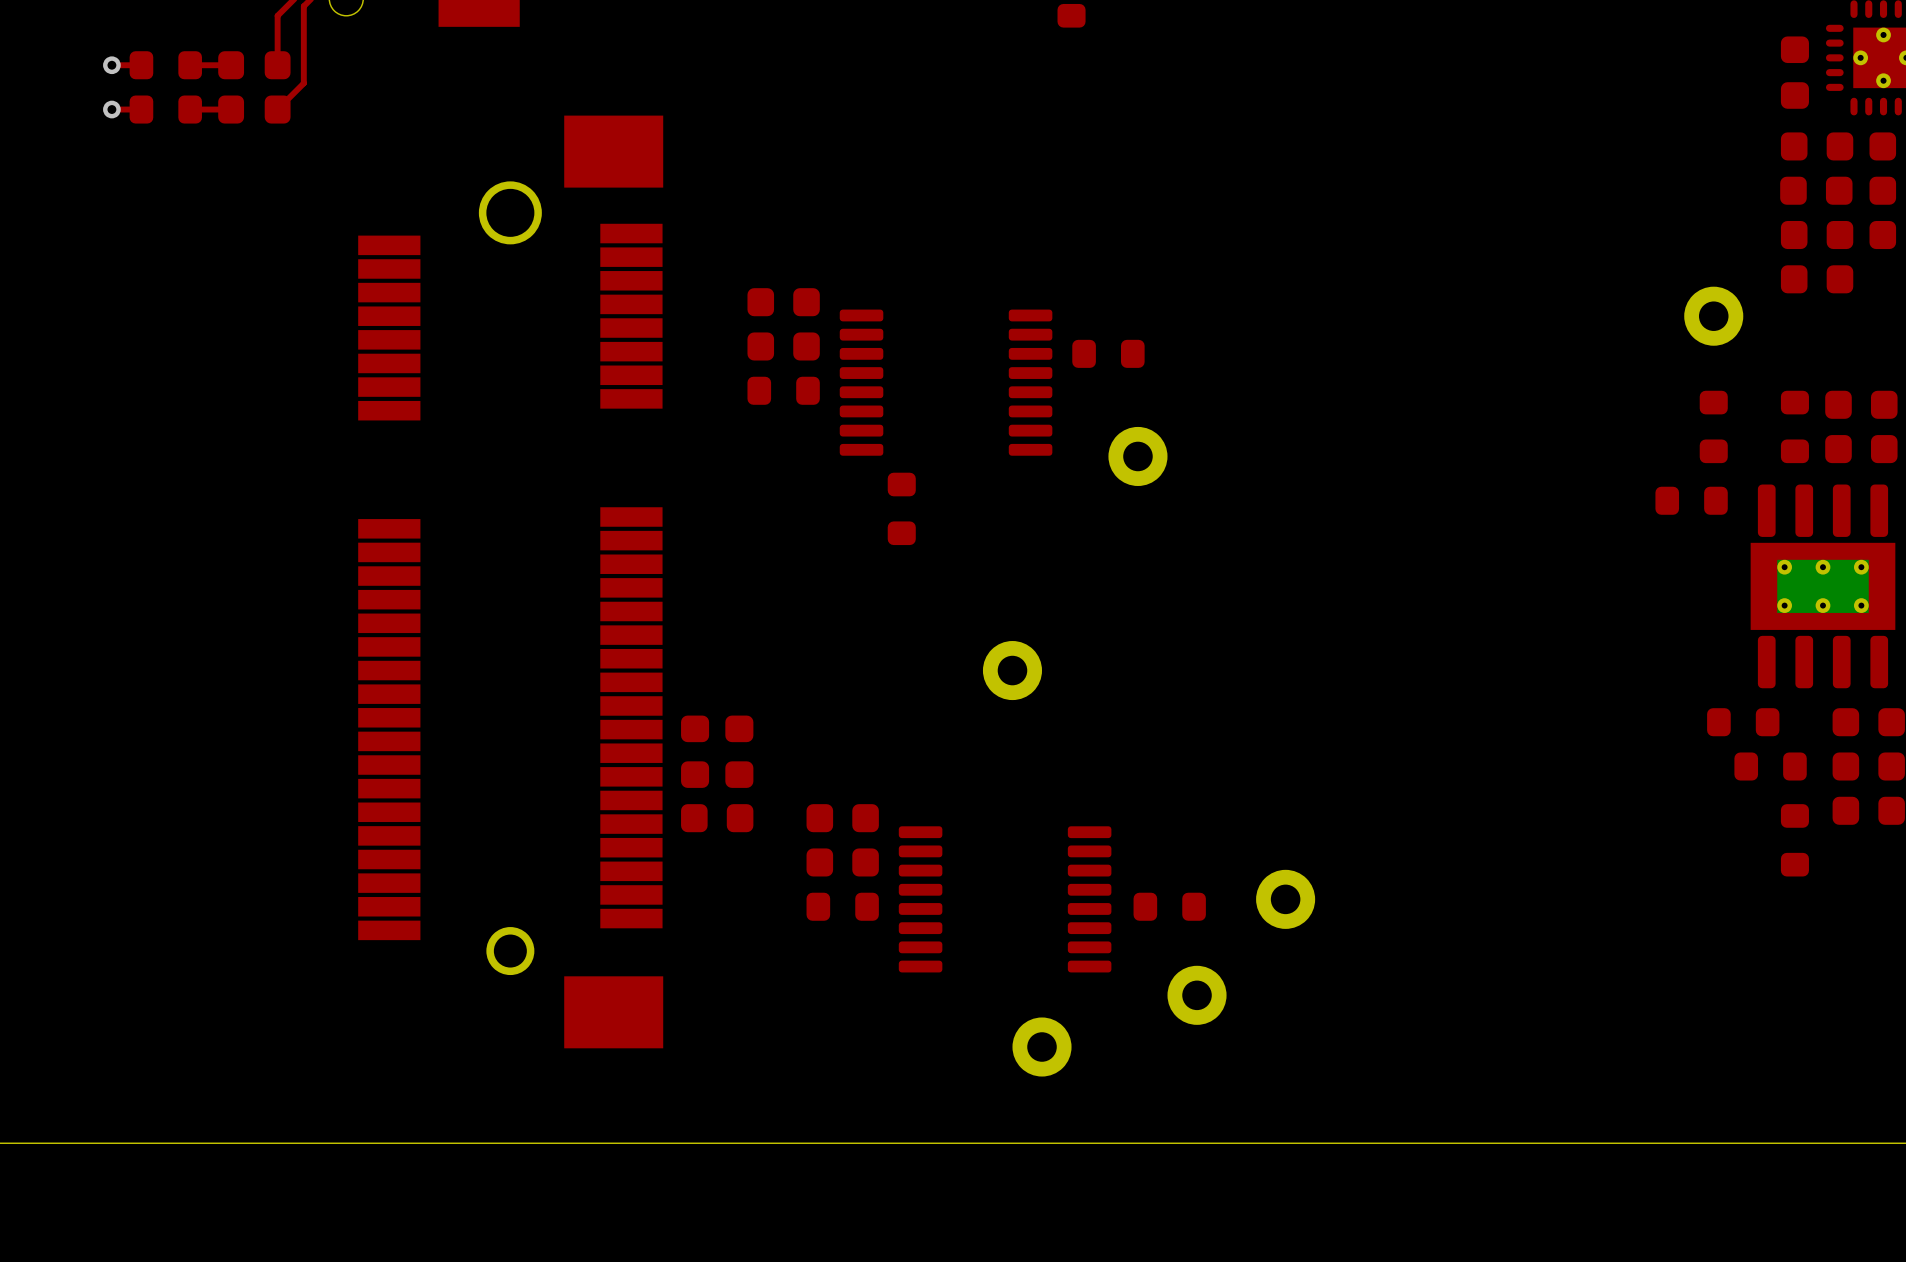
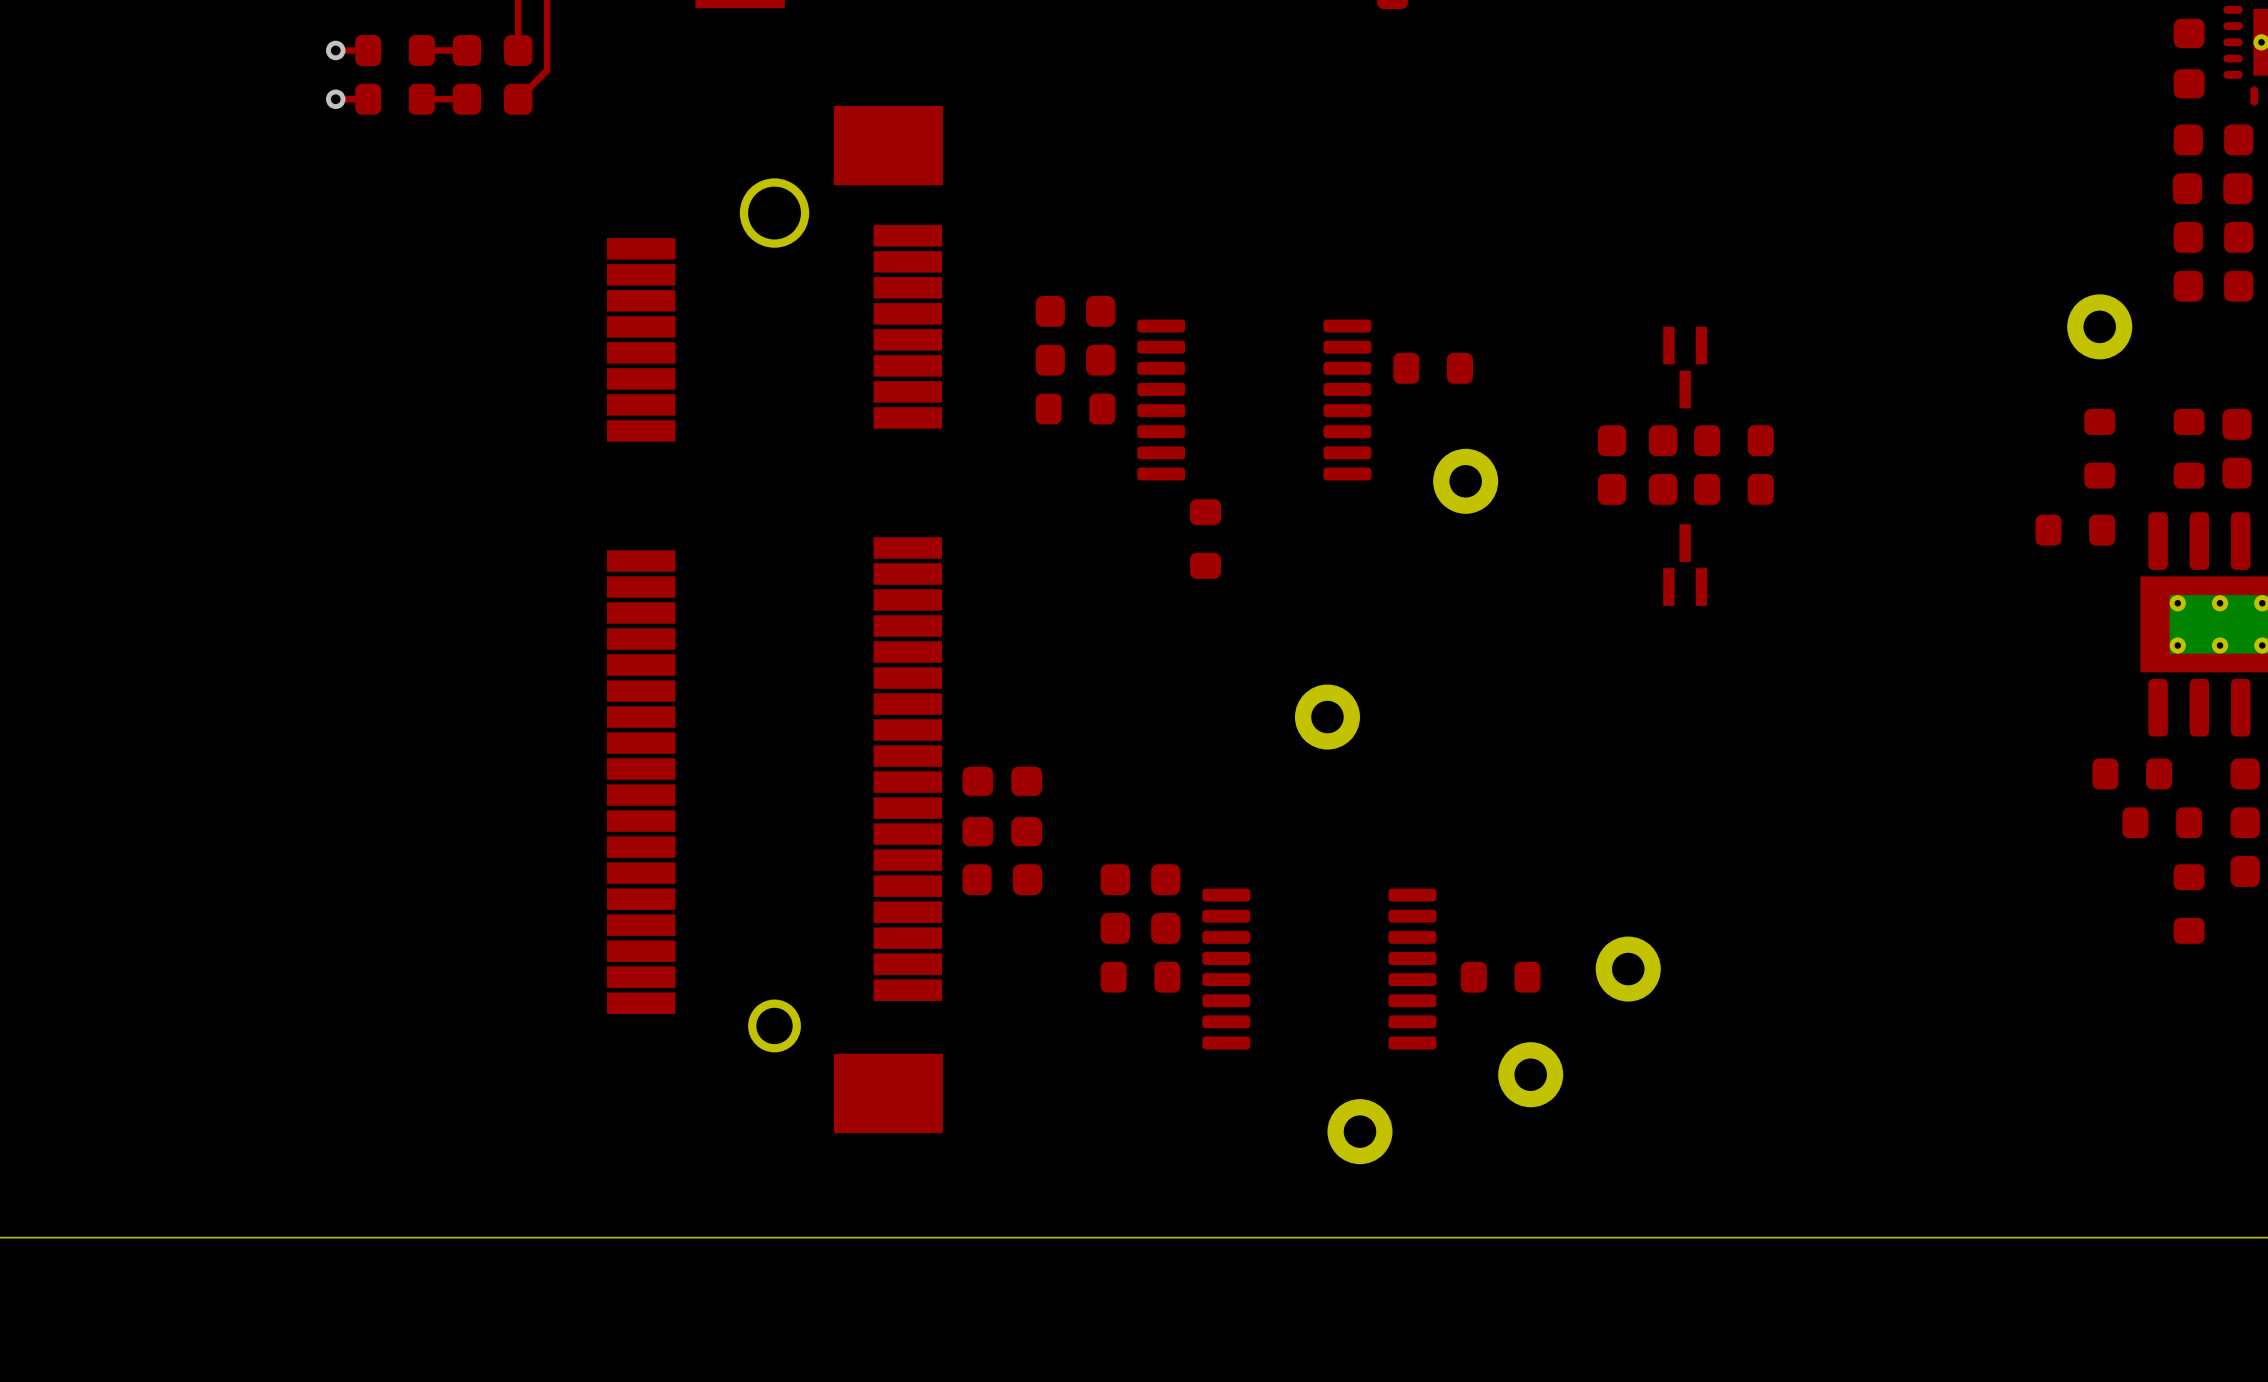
part: none -> (1685, 367)
part: none -> (1637, 440)
part: none -> (1733, 440)
part: none -> (1637, 489)
part: none -> (1733, 489)
part: none -> (1685, 565)

